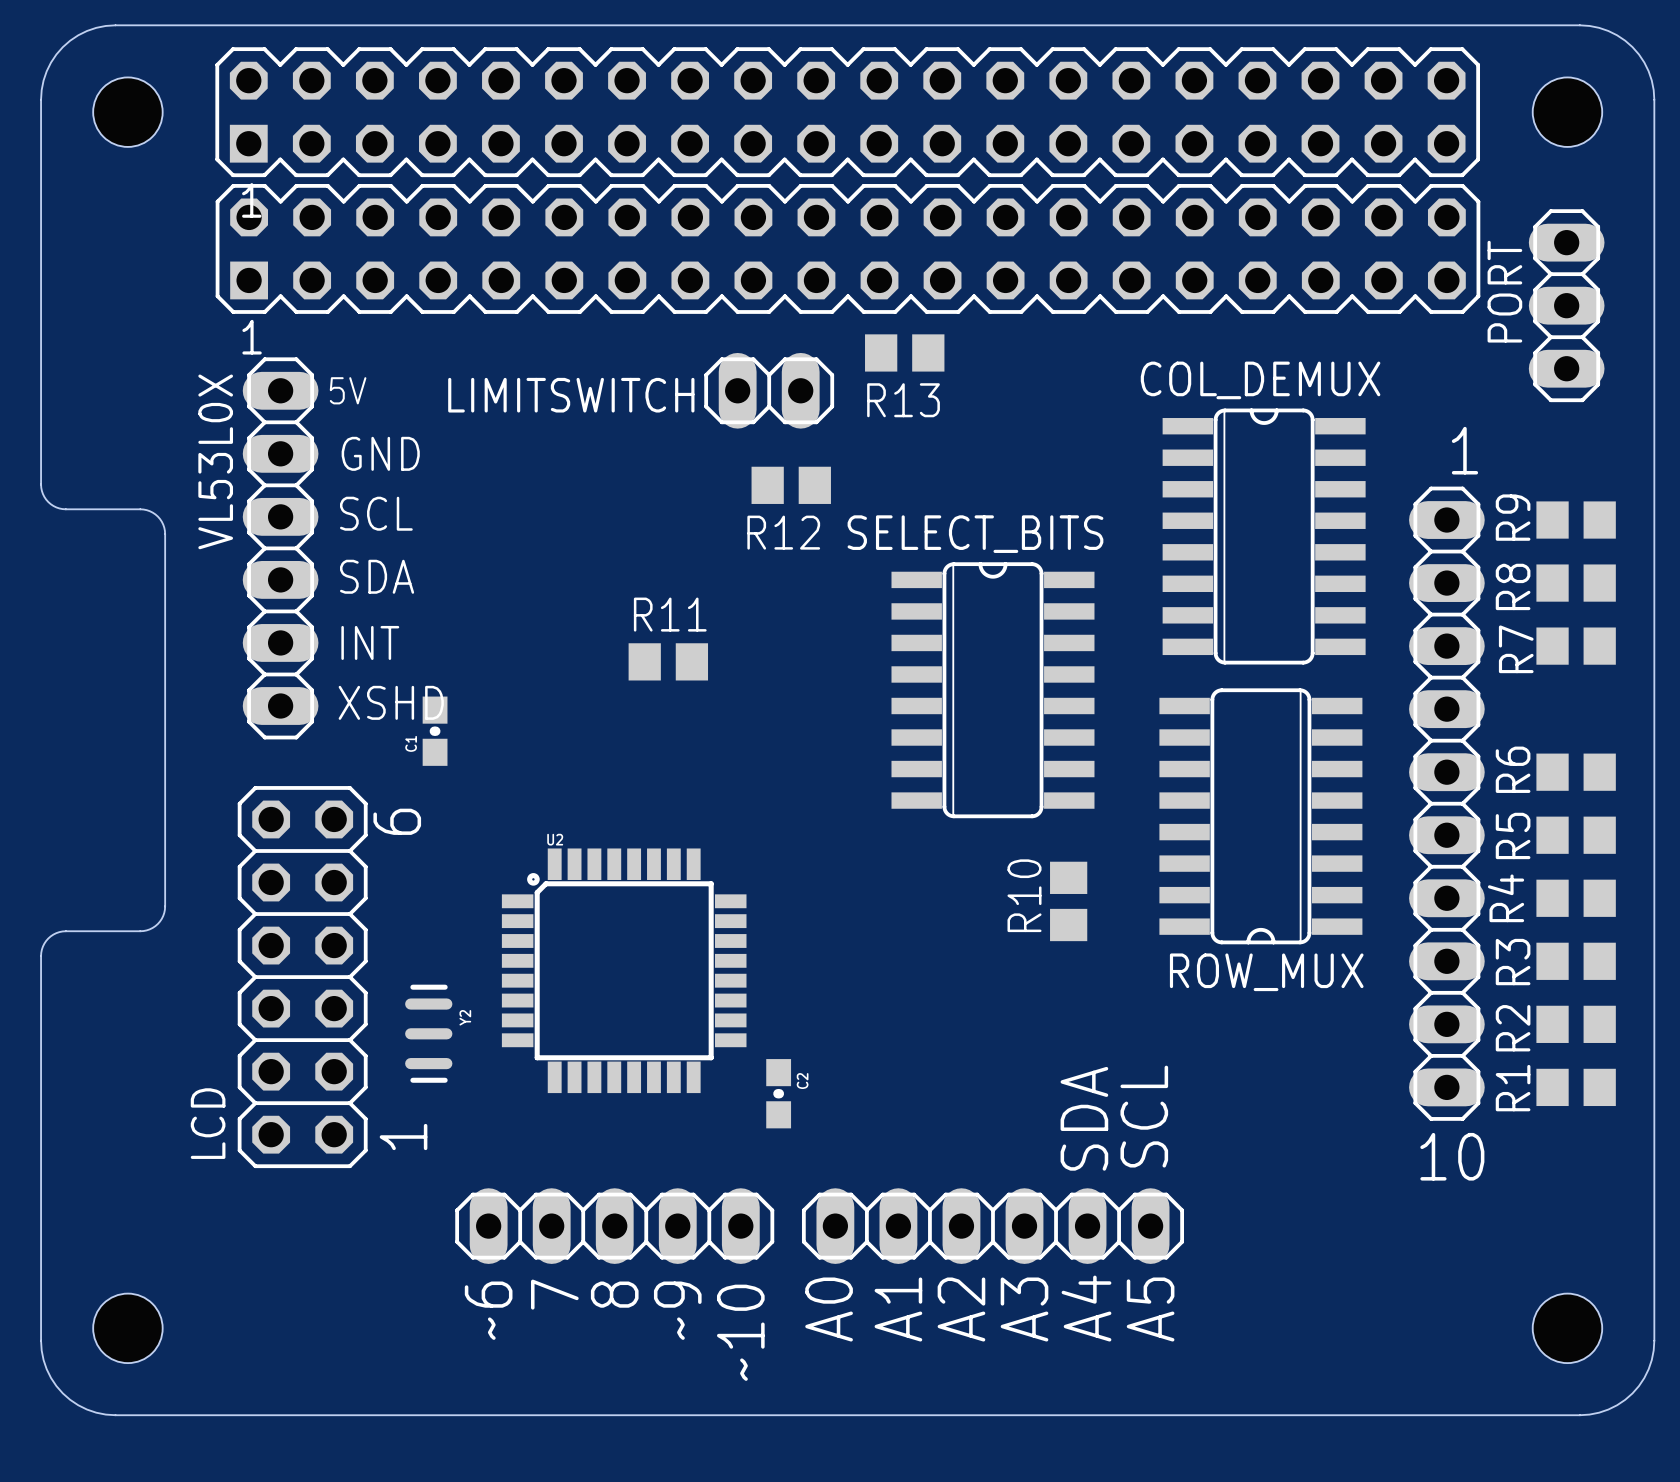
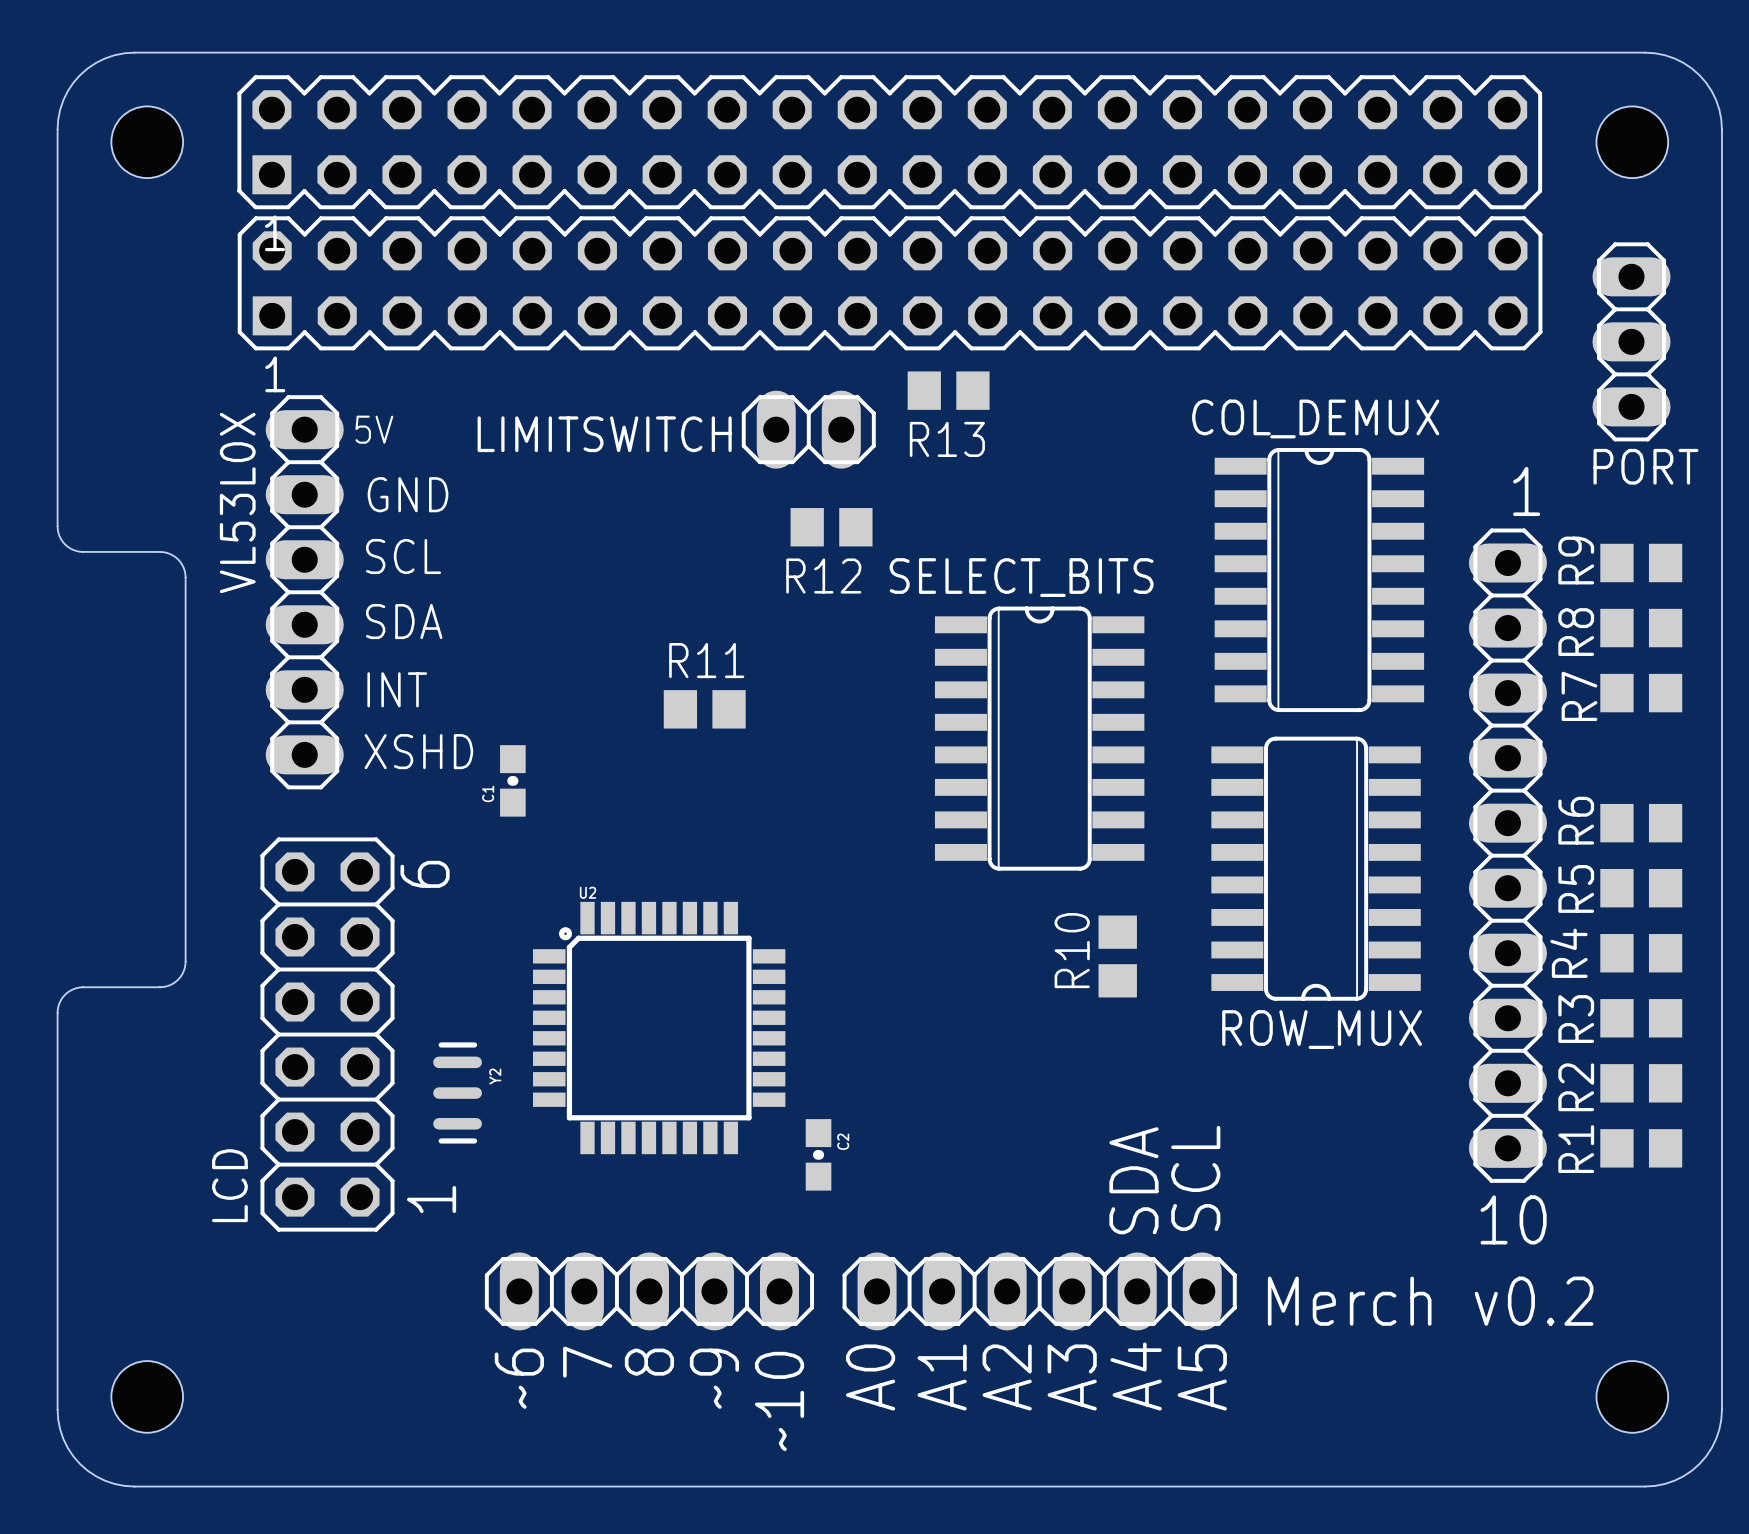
PORT name rotation: 0° (1504, 291) -> 90° clockwise (1645, 466)
PORT name position: PORT (1504, 291) -> PORT (1645, 466)
C1 position: (435, 731) -> (512, 780)
text: none -> Merch v0.2 (1430, 1301)

